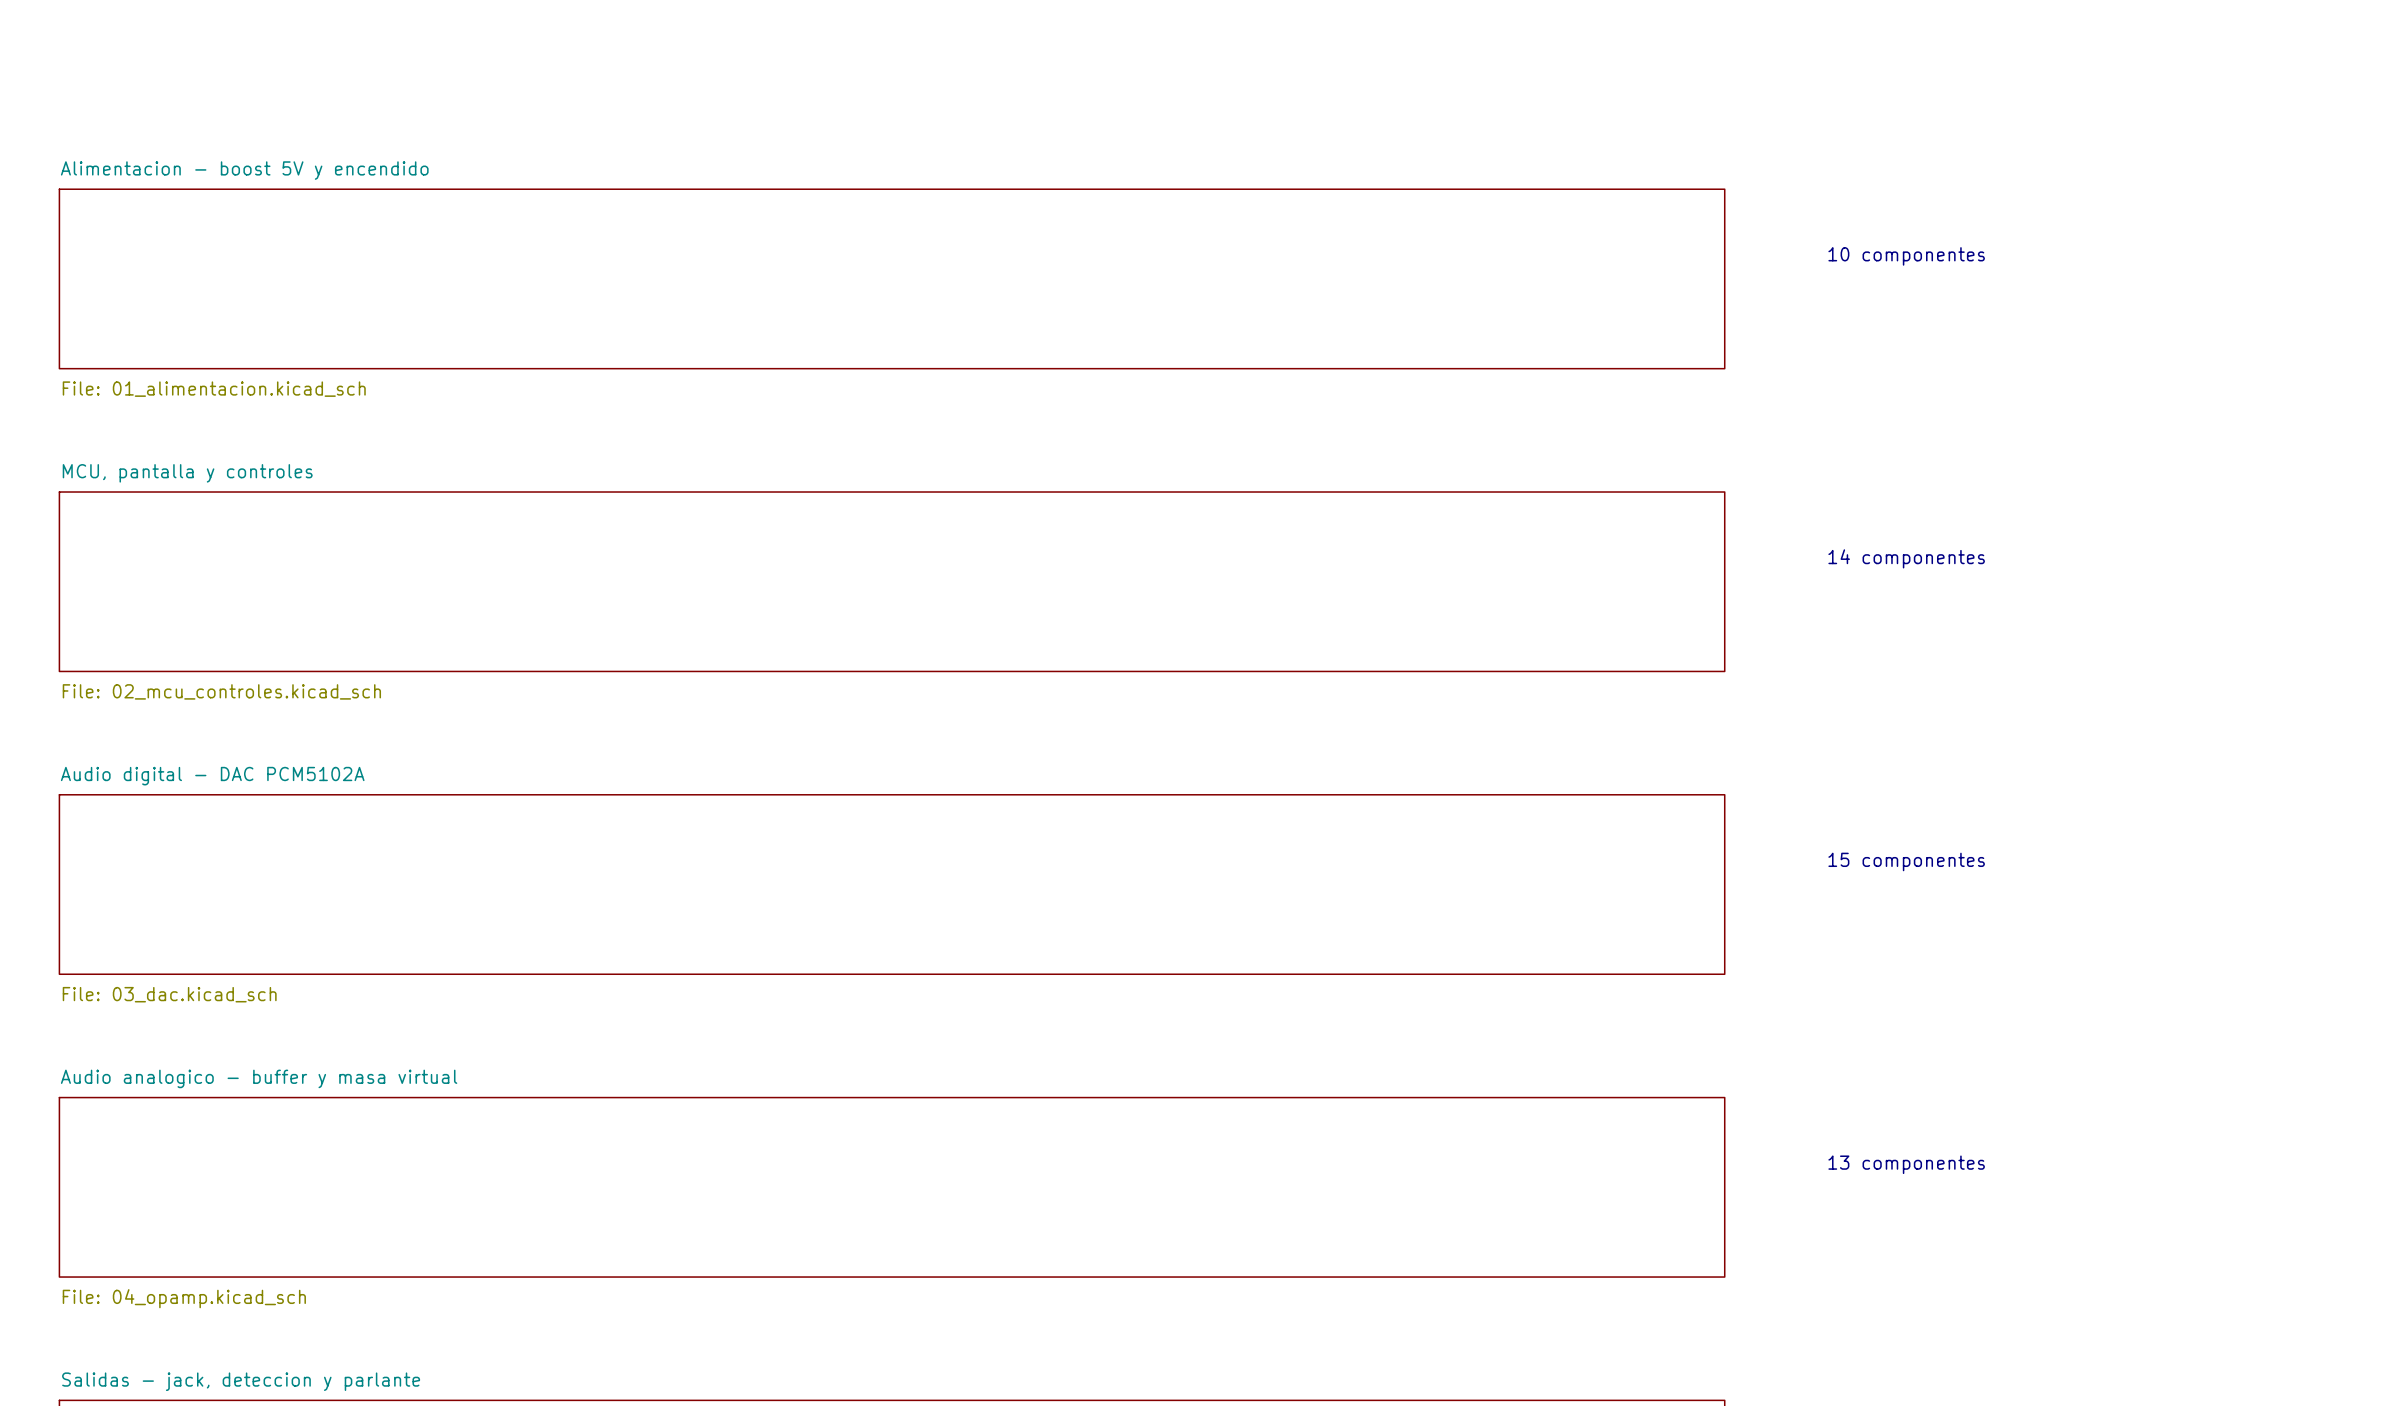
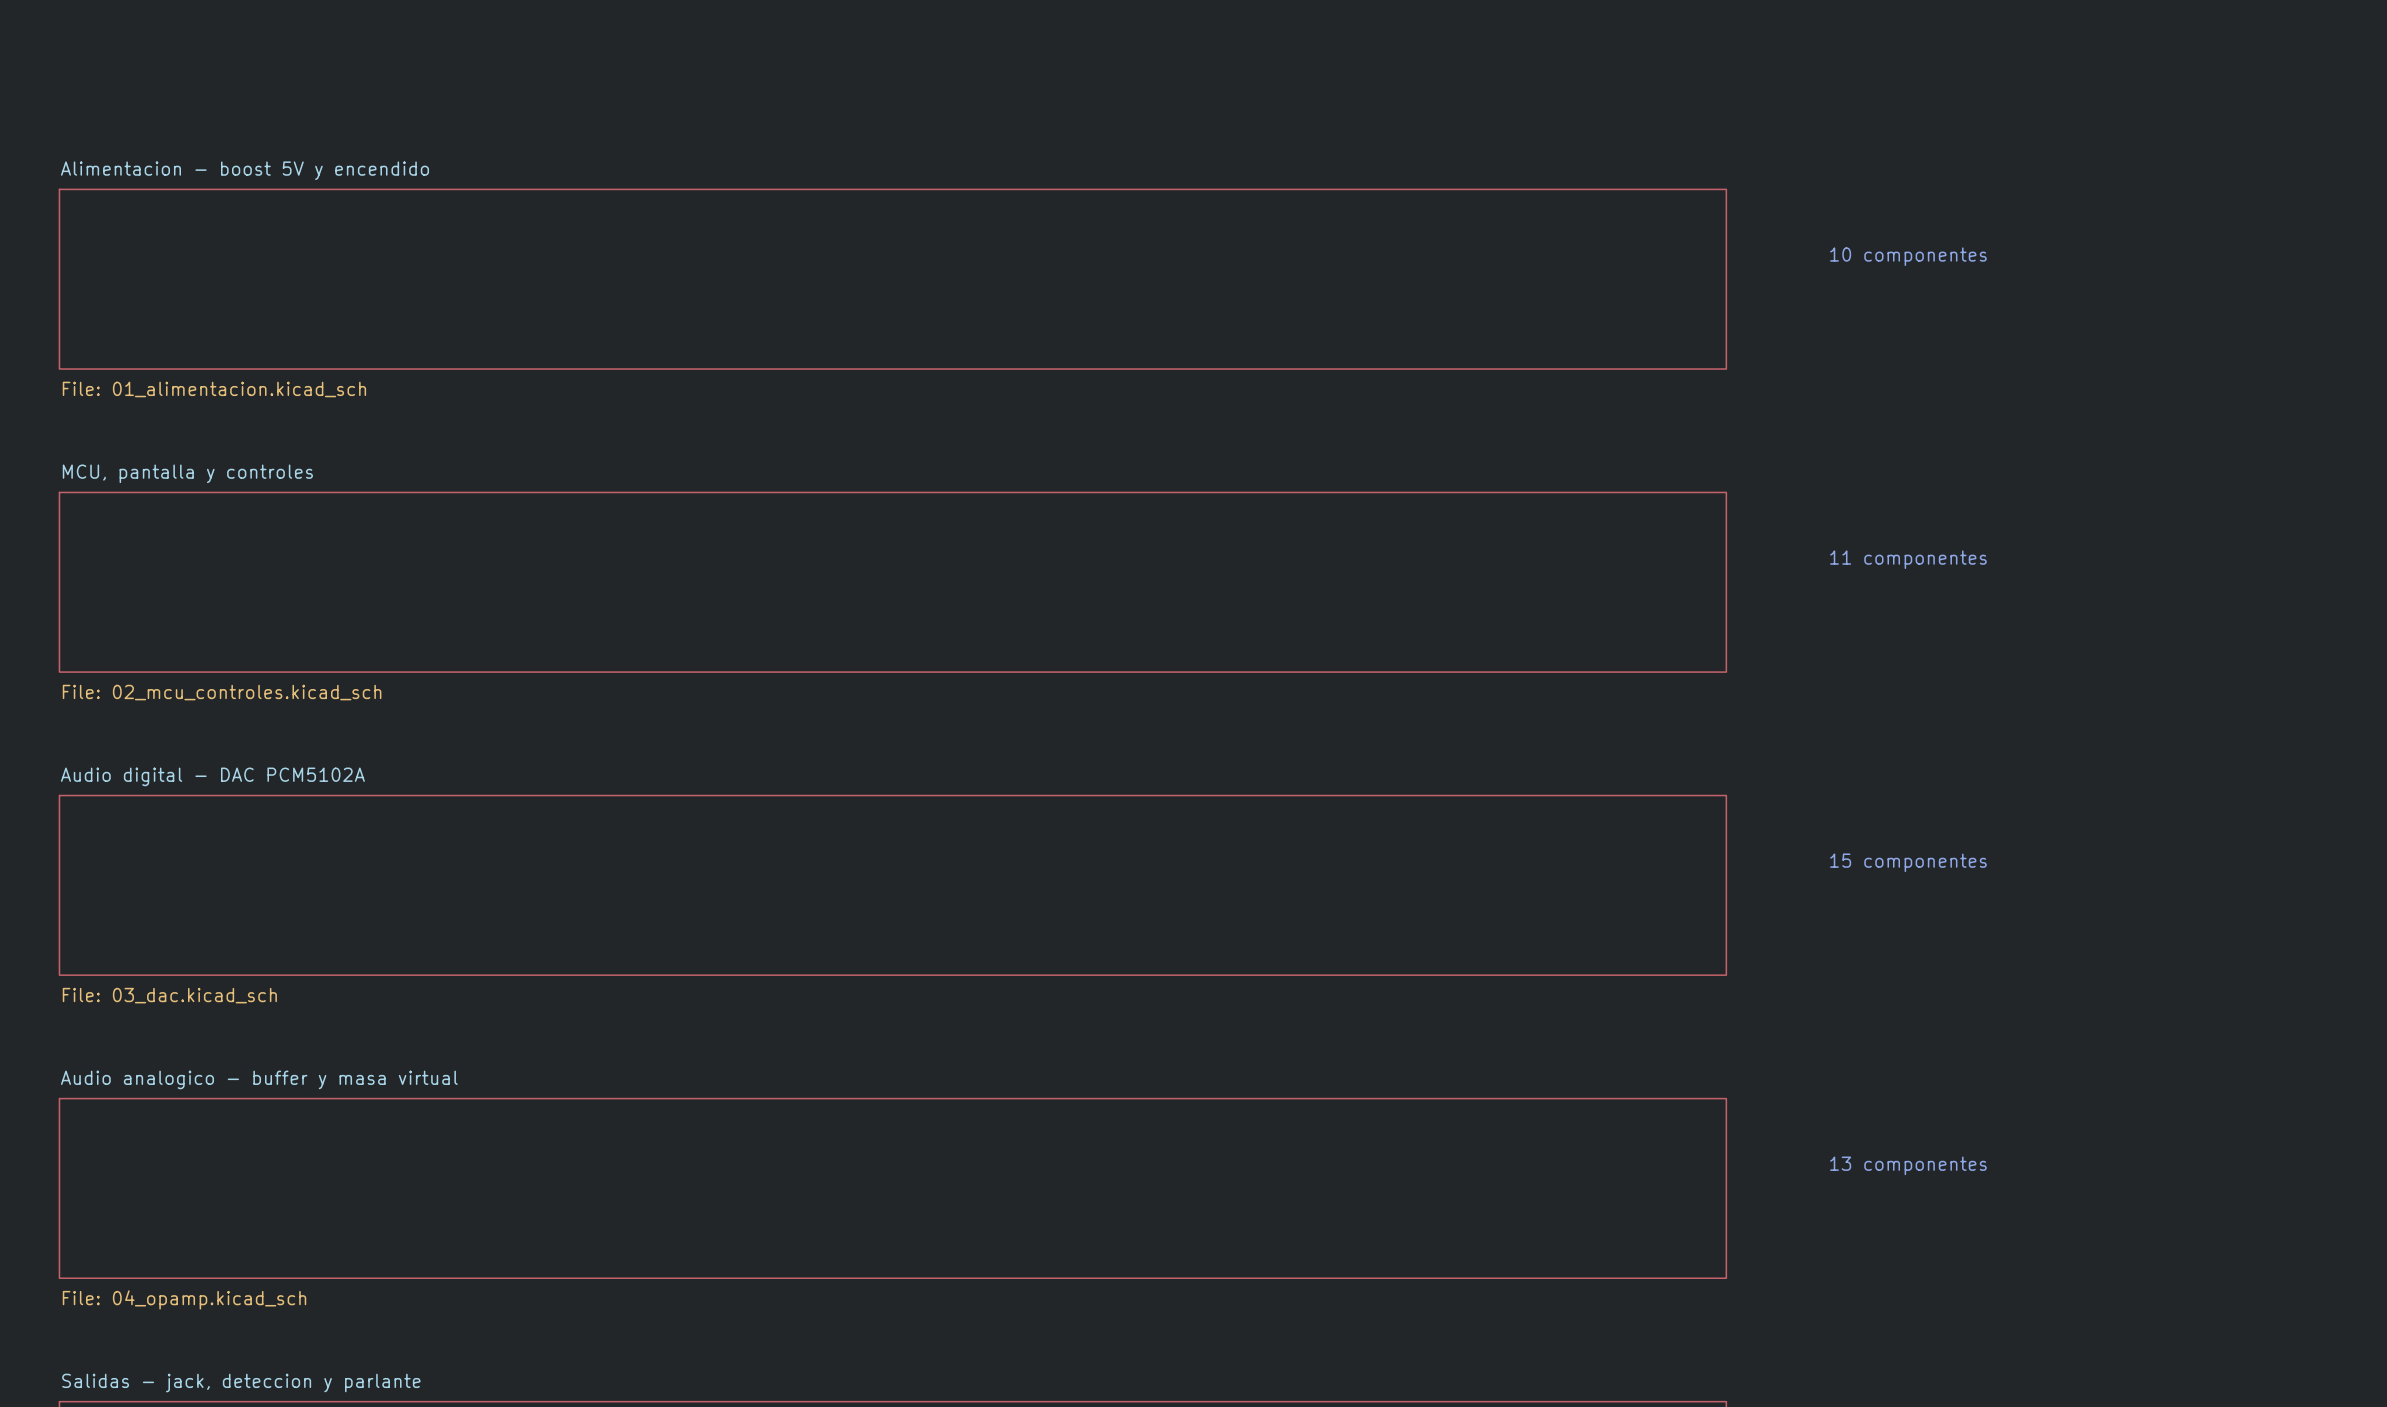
text: 14 componentes (1906, 558) -> 11 componentes (1908, 559)

